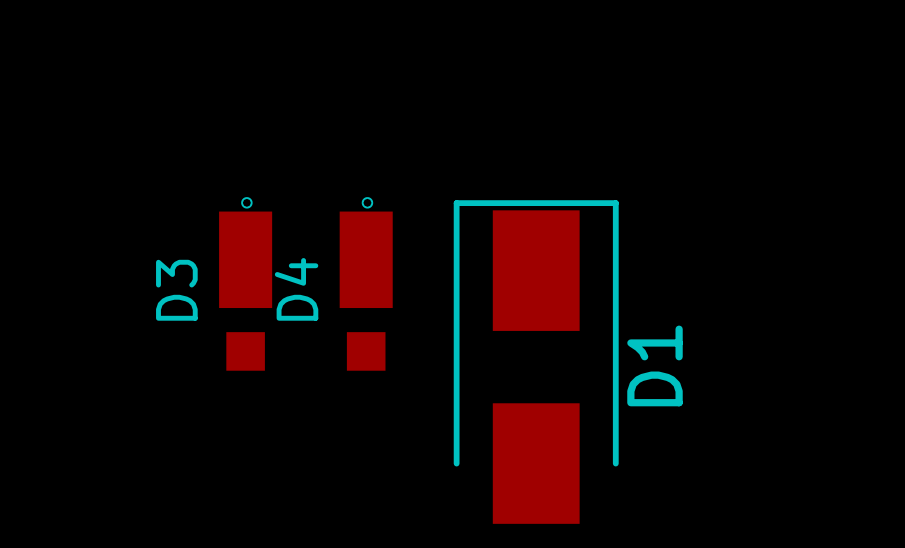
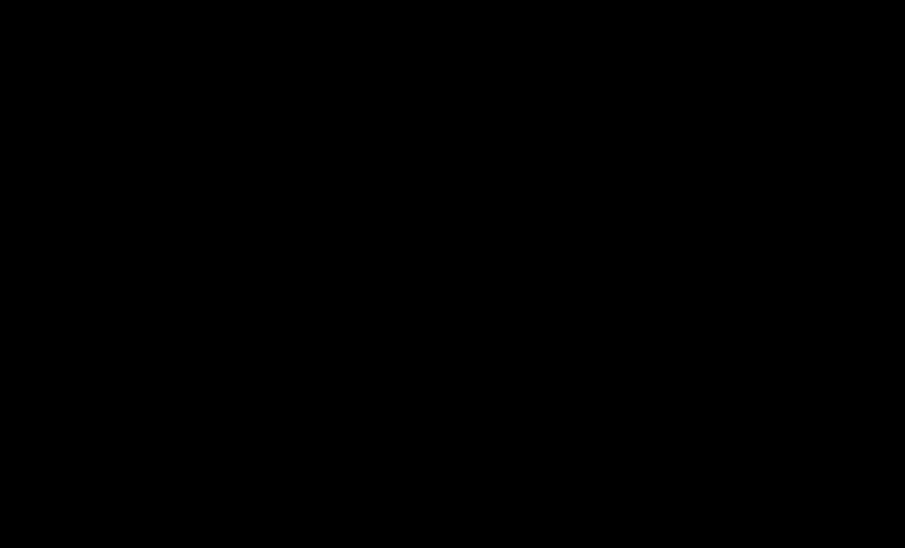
D3: (245, 283) -> none
D4: (366, 283) -> none
D1: (536, 362) -> none

